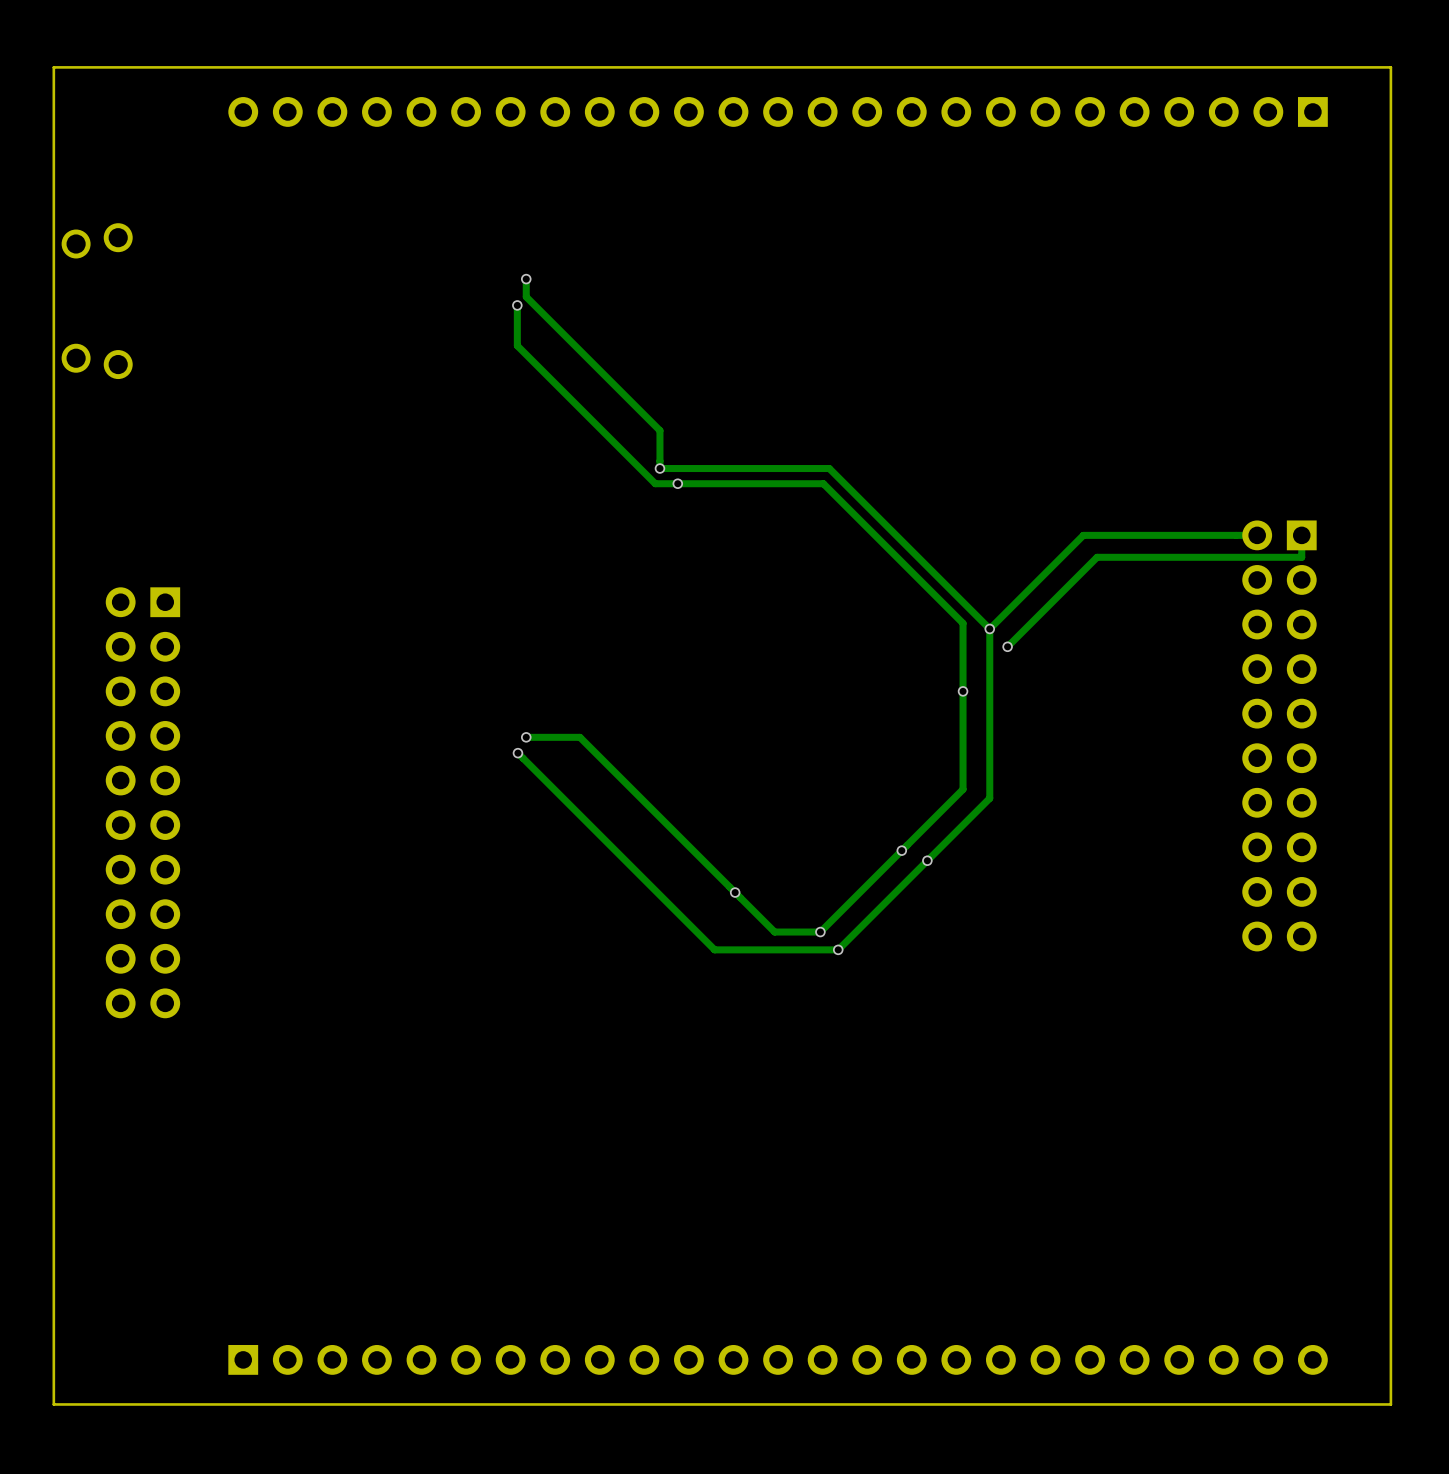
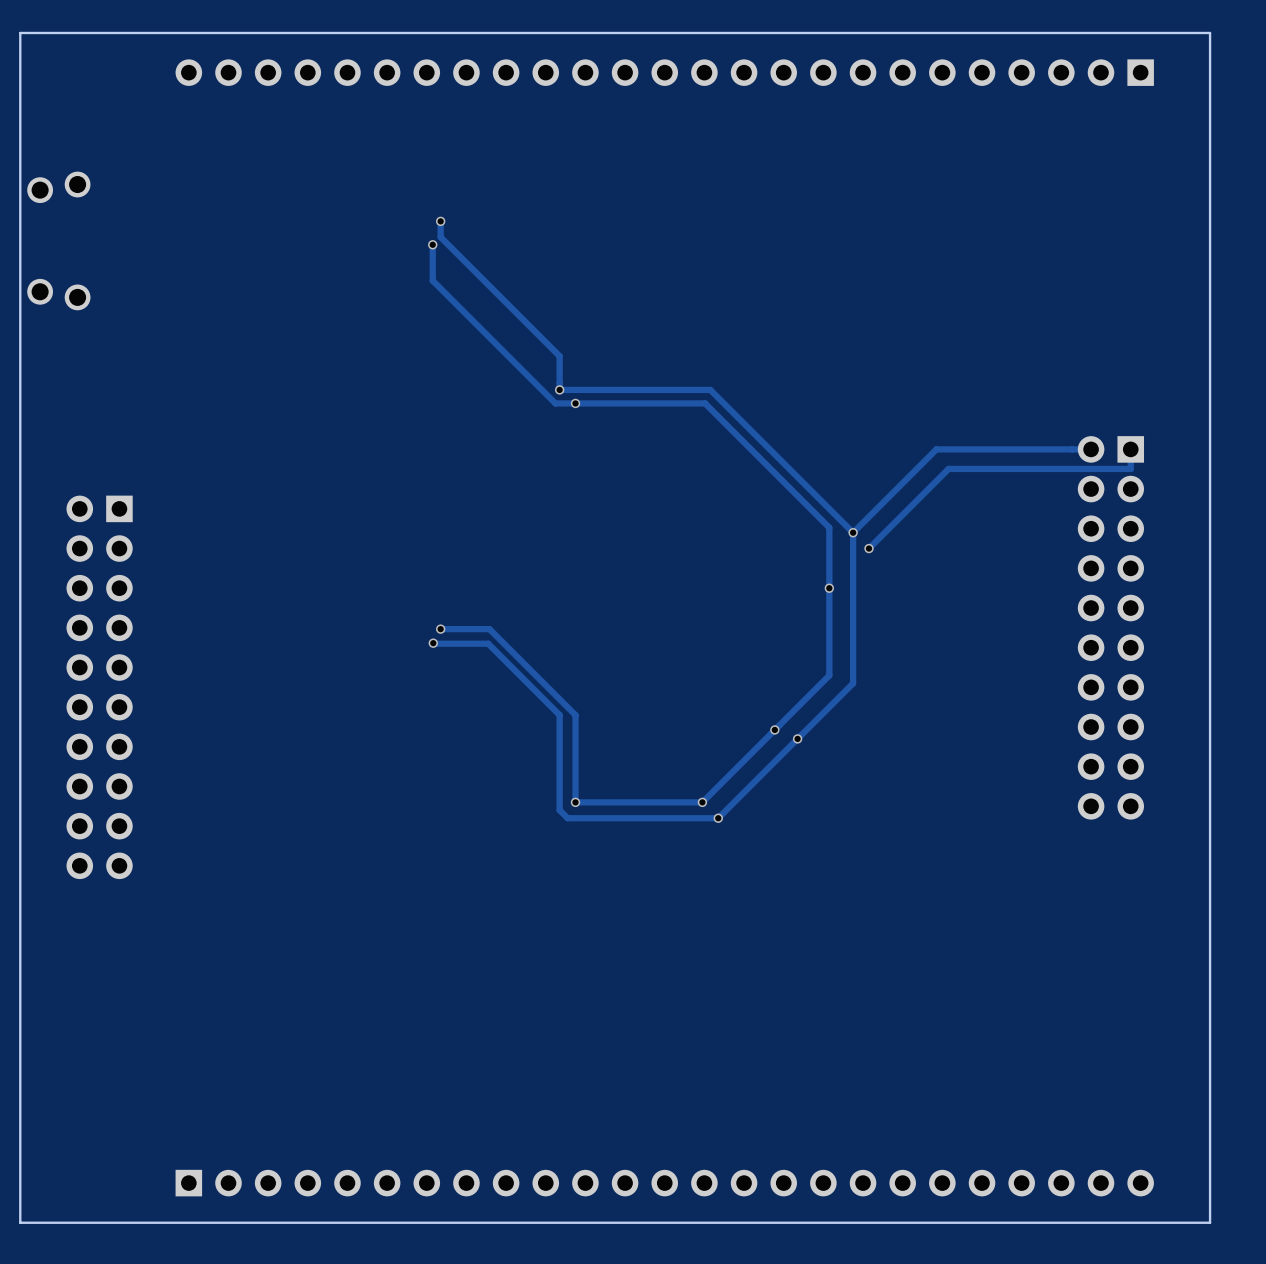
track: (579, 737) (774, 932) -> (488, 629) (575, 715) (575, 802) (661, 802)
track: (517, 753) (714, 949) -> (432, 643) (488, 643) (559, 715) (559, 810) (567, 818) (608, 818)
via position: (735, 892) -> (575, 802)

